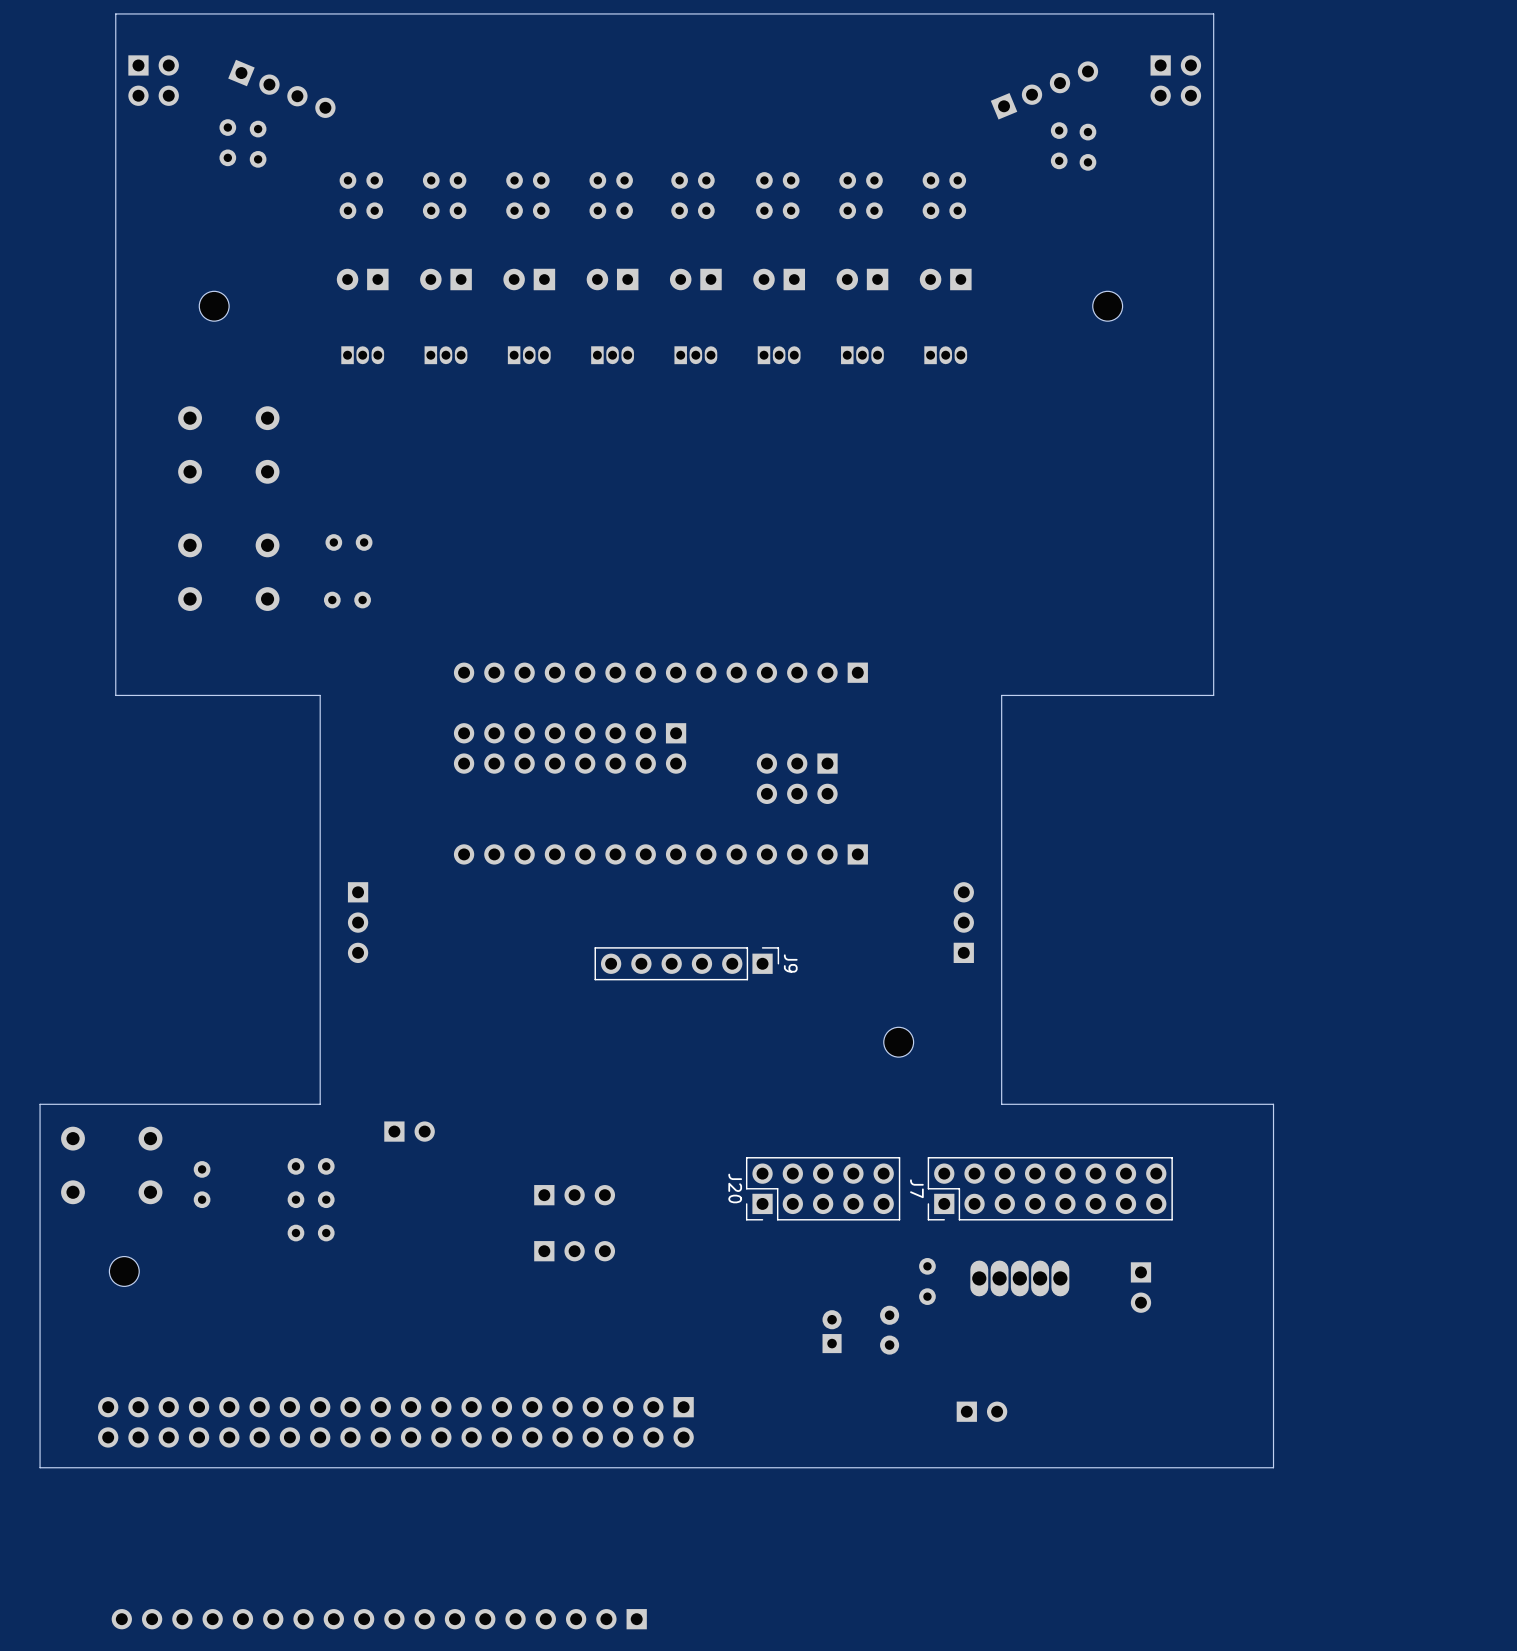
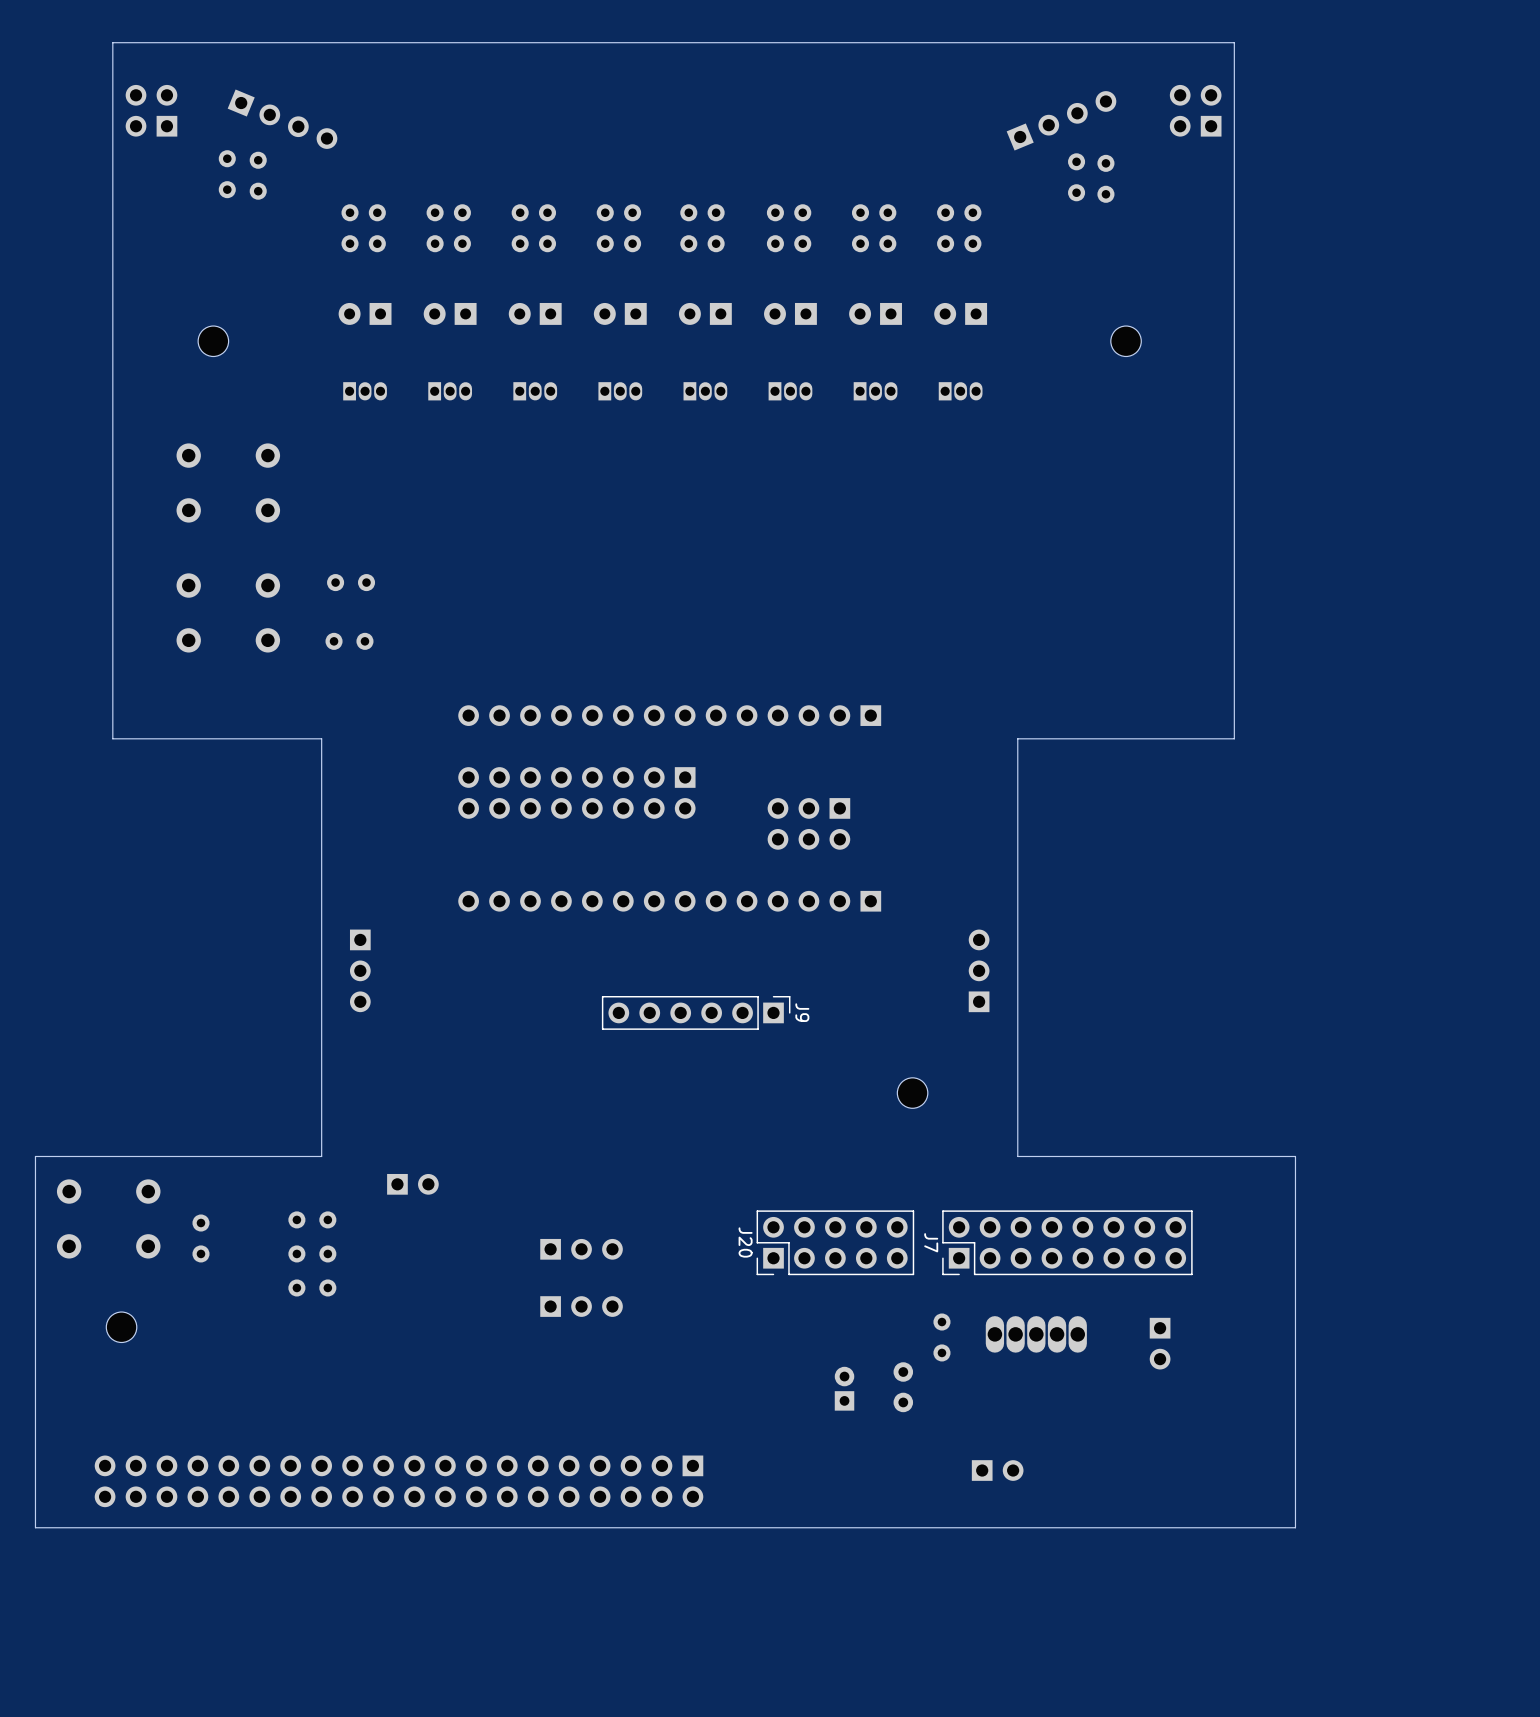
part rotation: 0° (153, 80) -> 180° (151, 110)
part rotation: 0° (1175, 80) -> 180° (1195, 110)
part: (379, 1619) -> none

